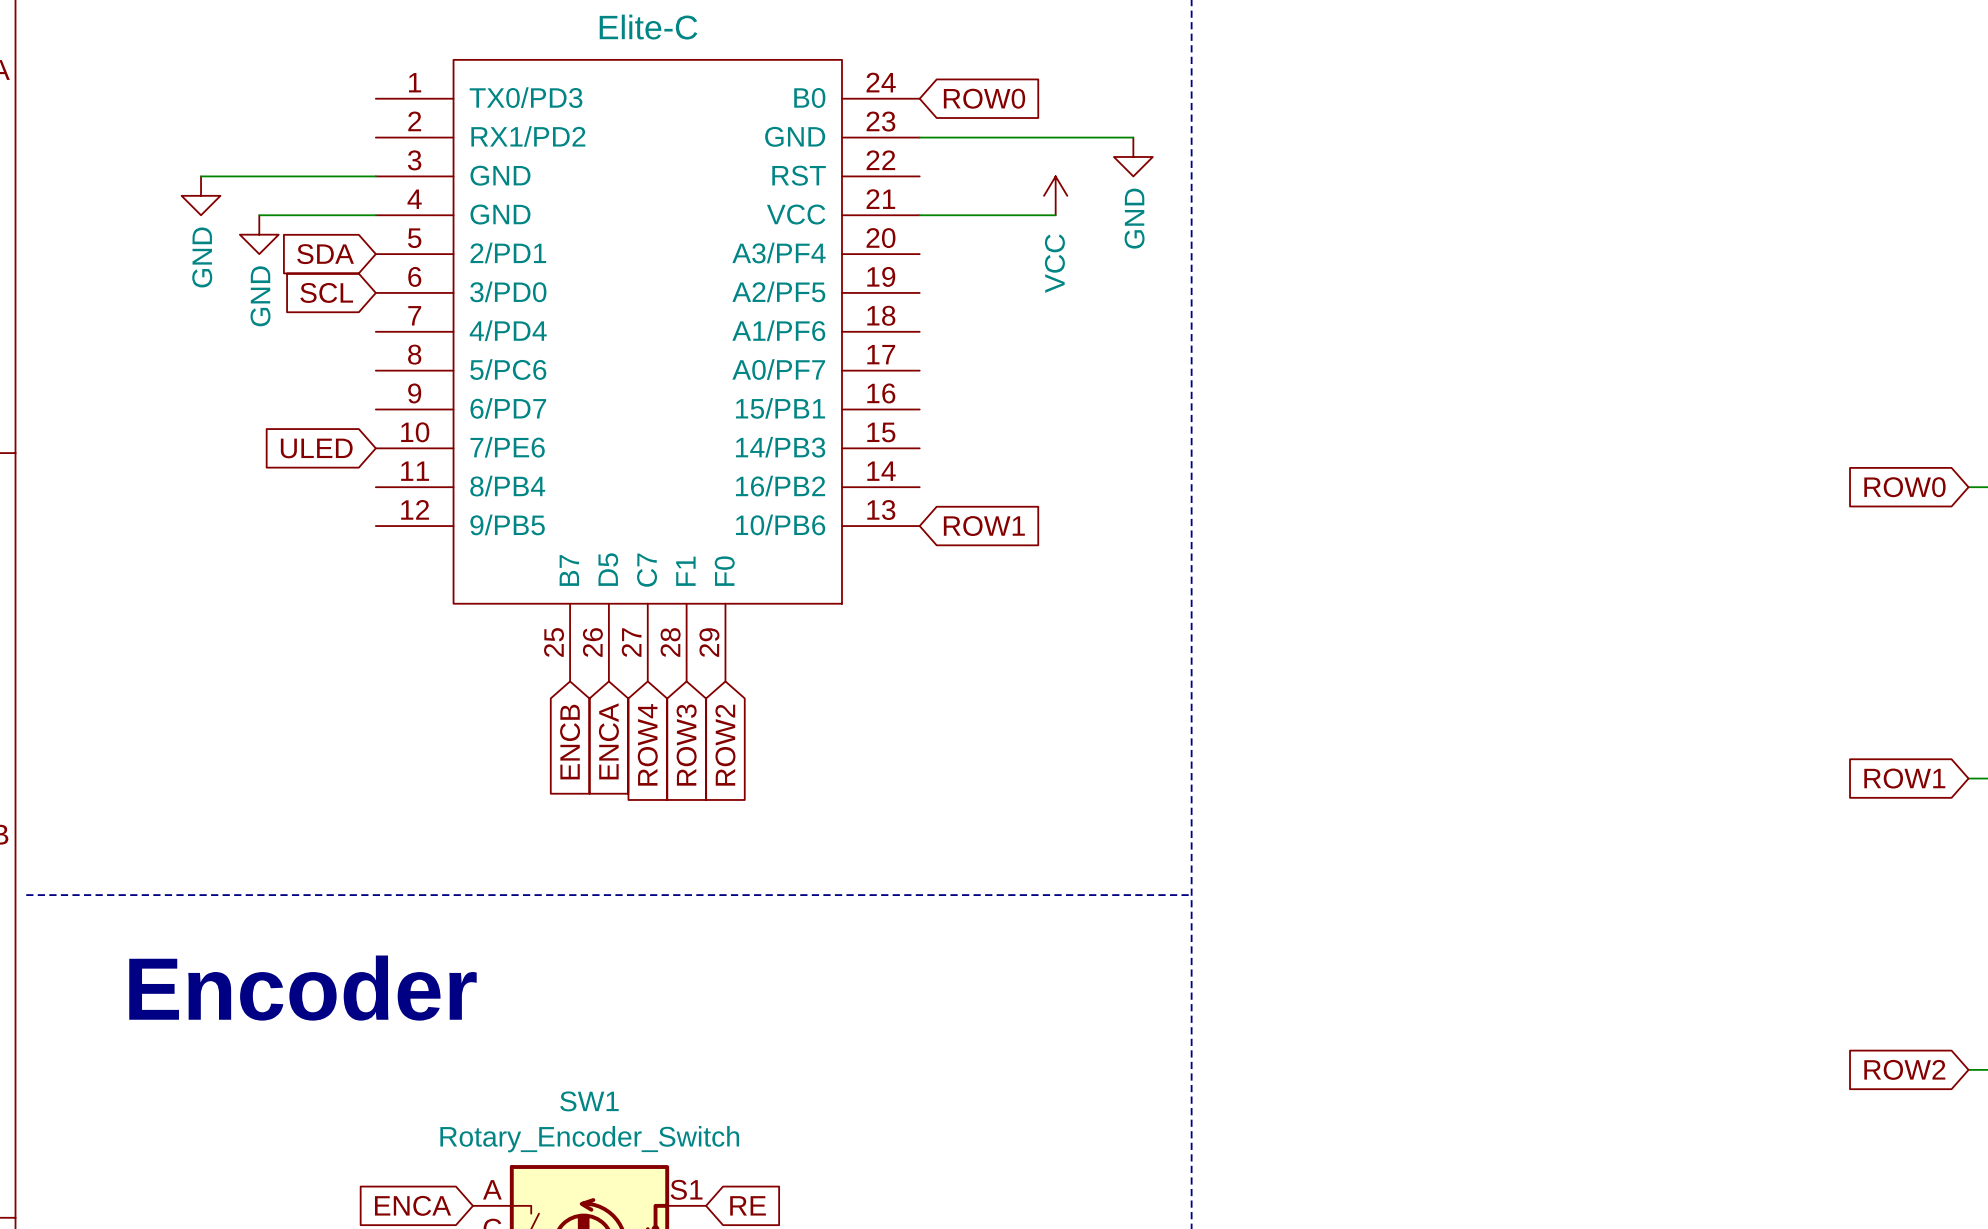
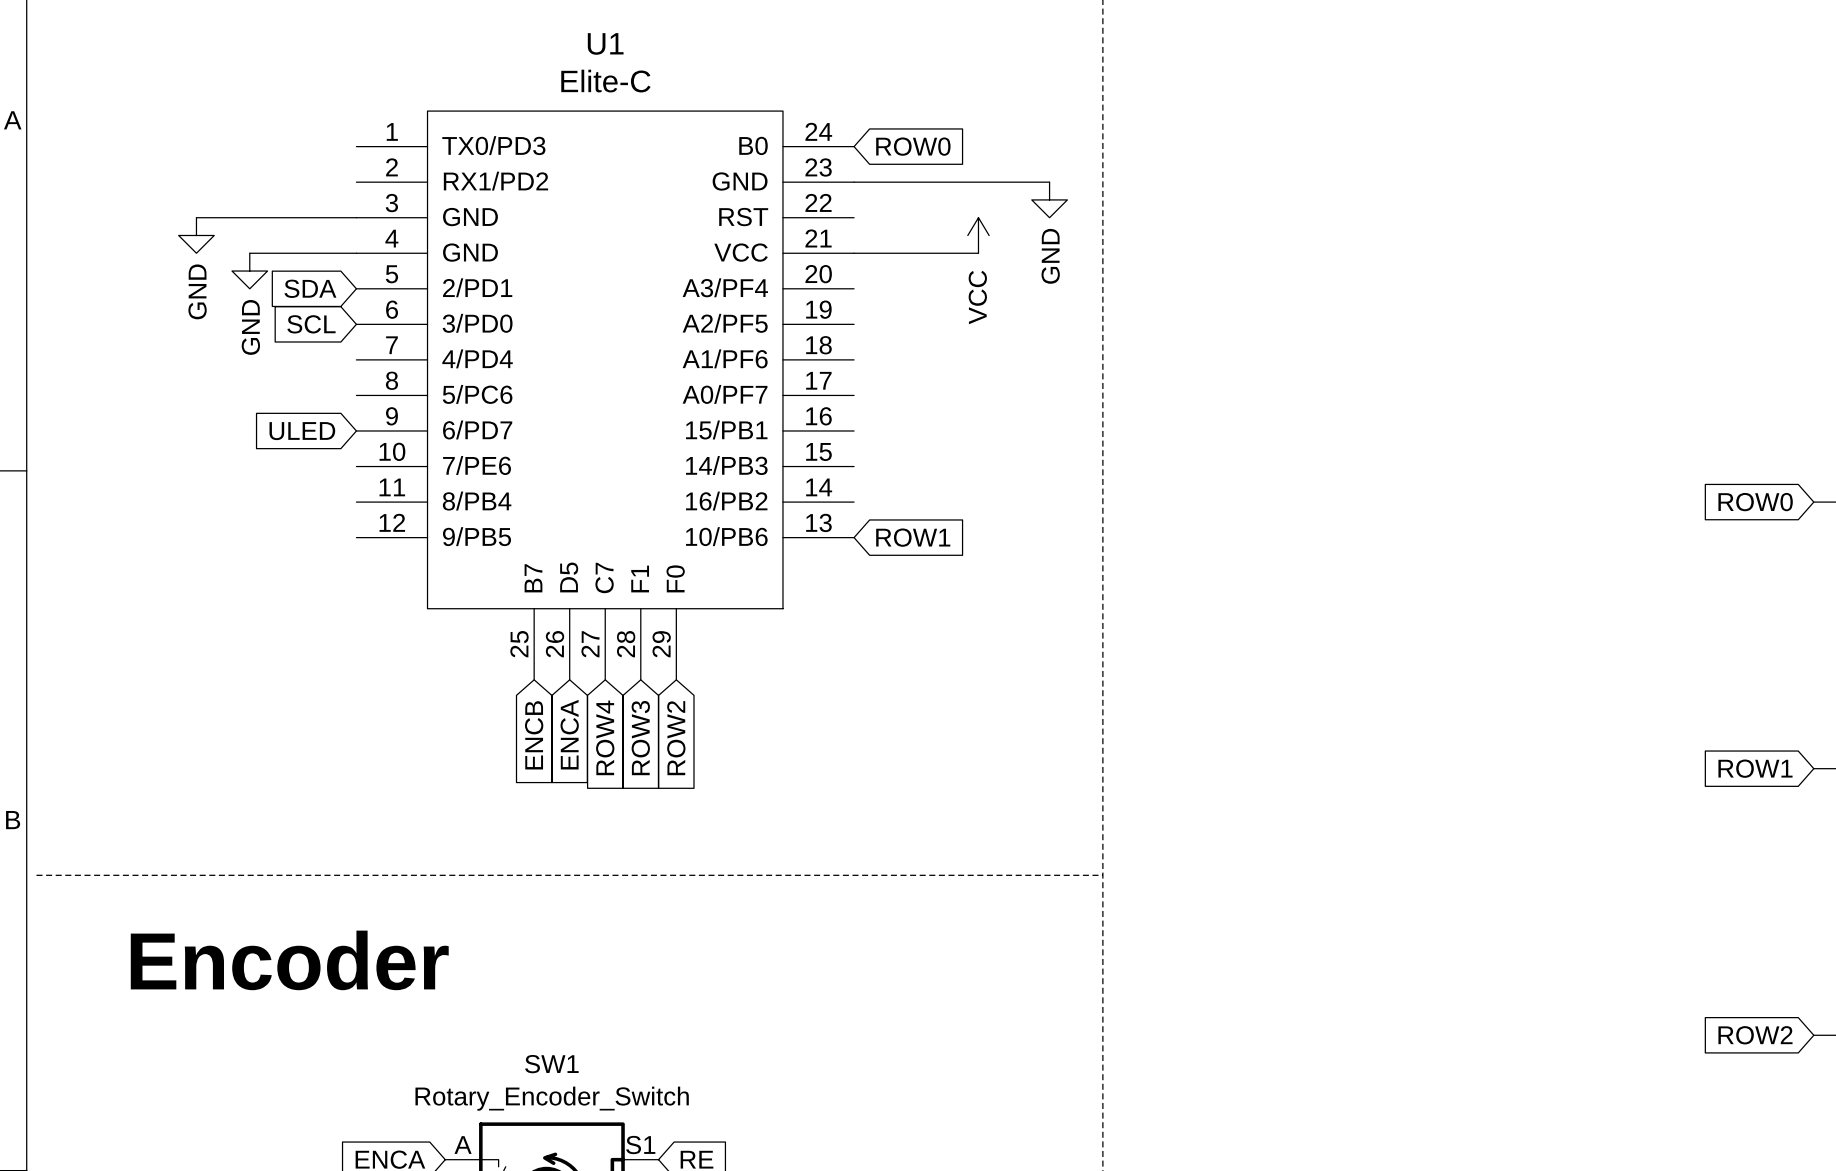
global label position: ULED (316, 448) -> ULED (302, 431)

